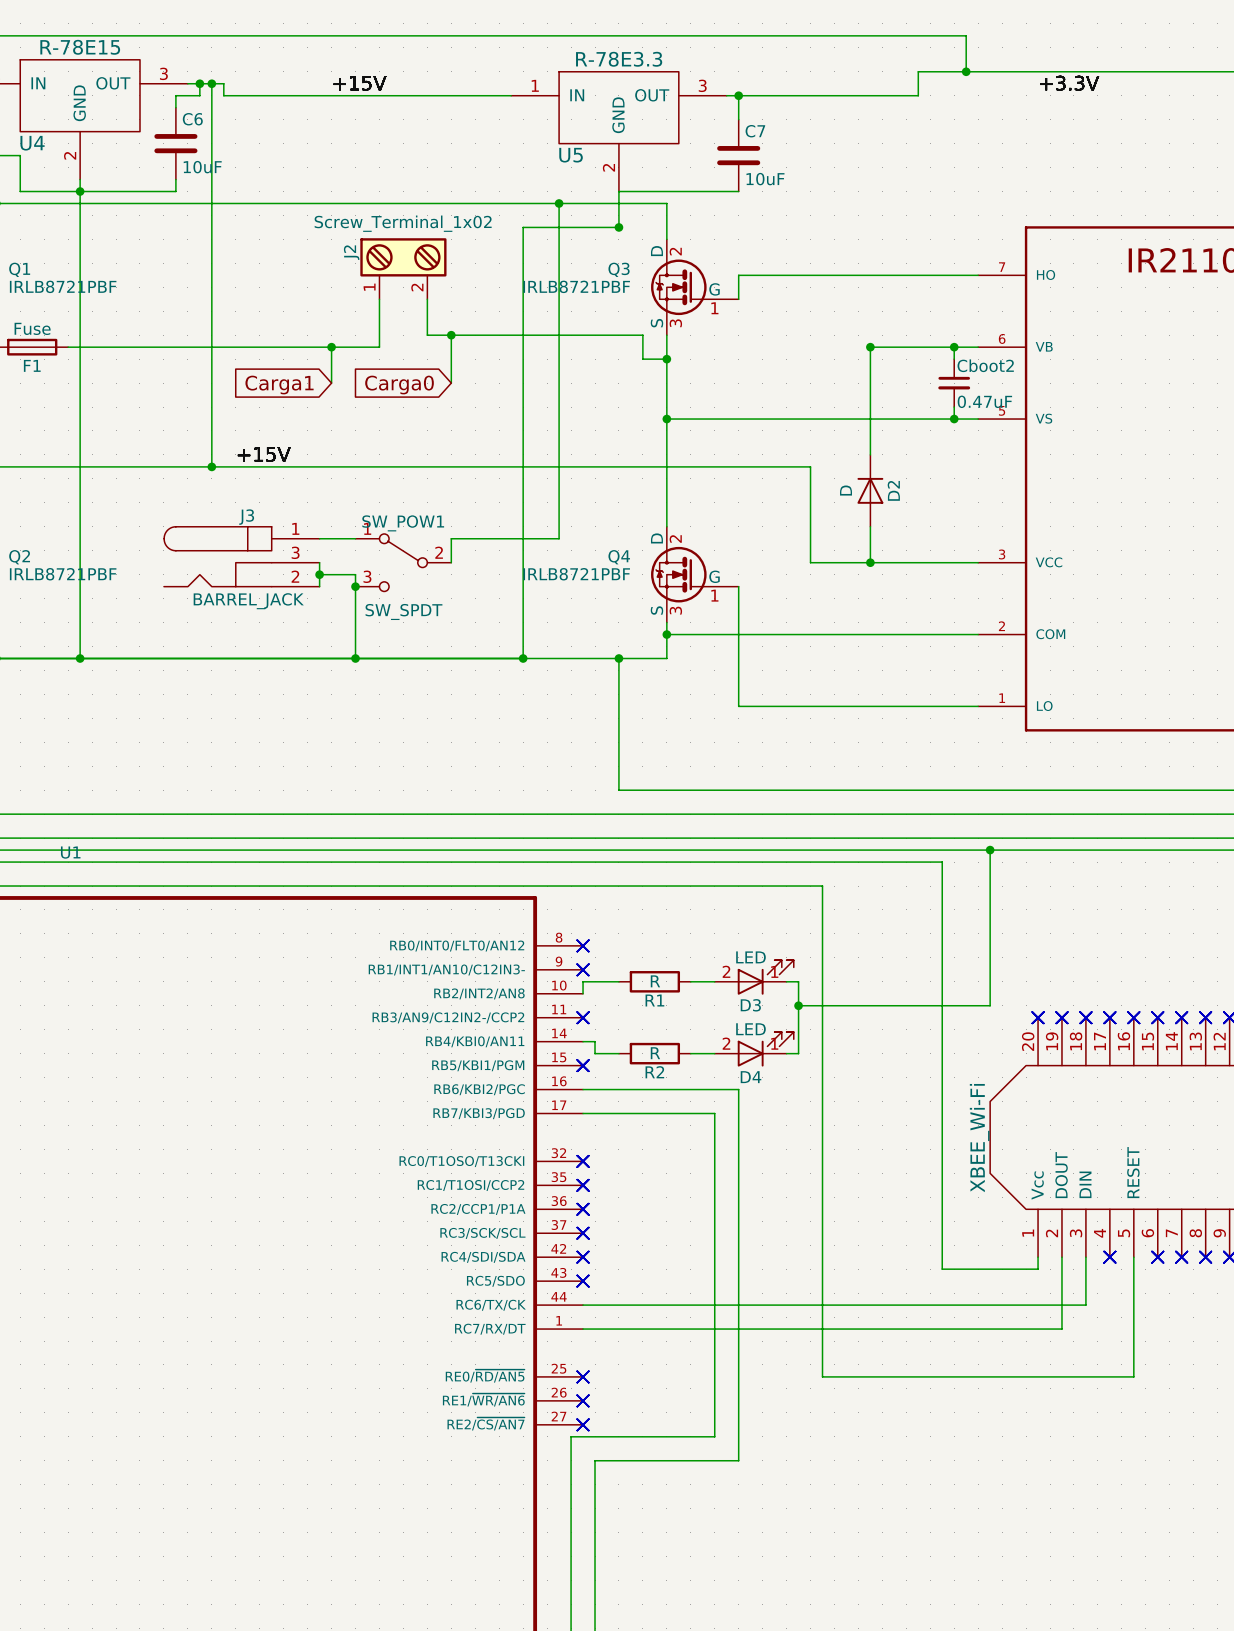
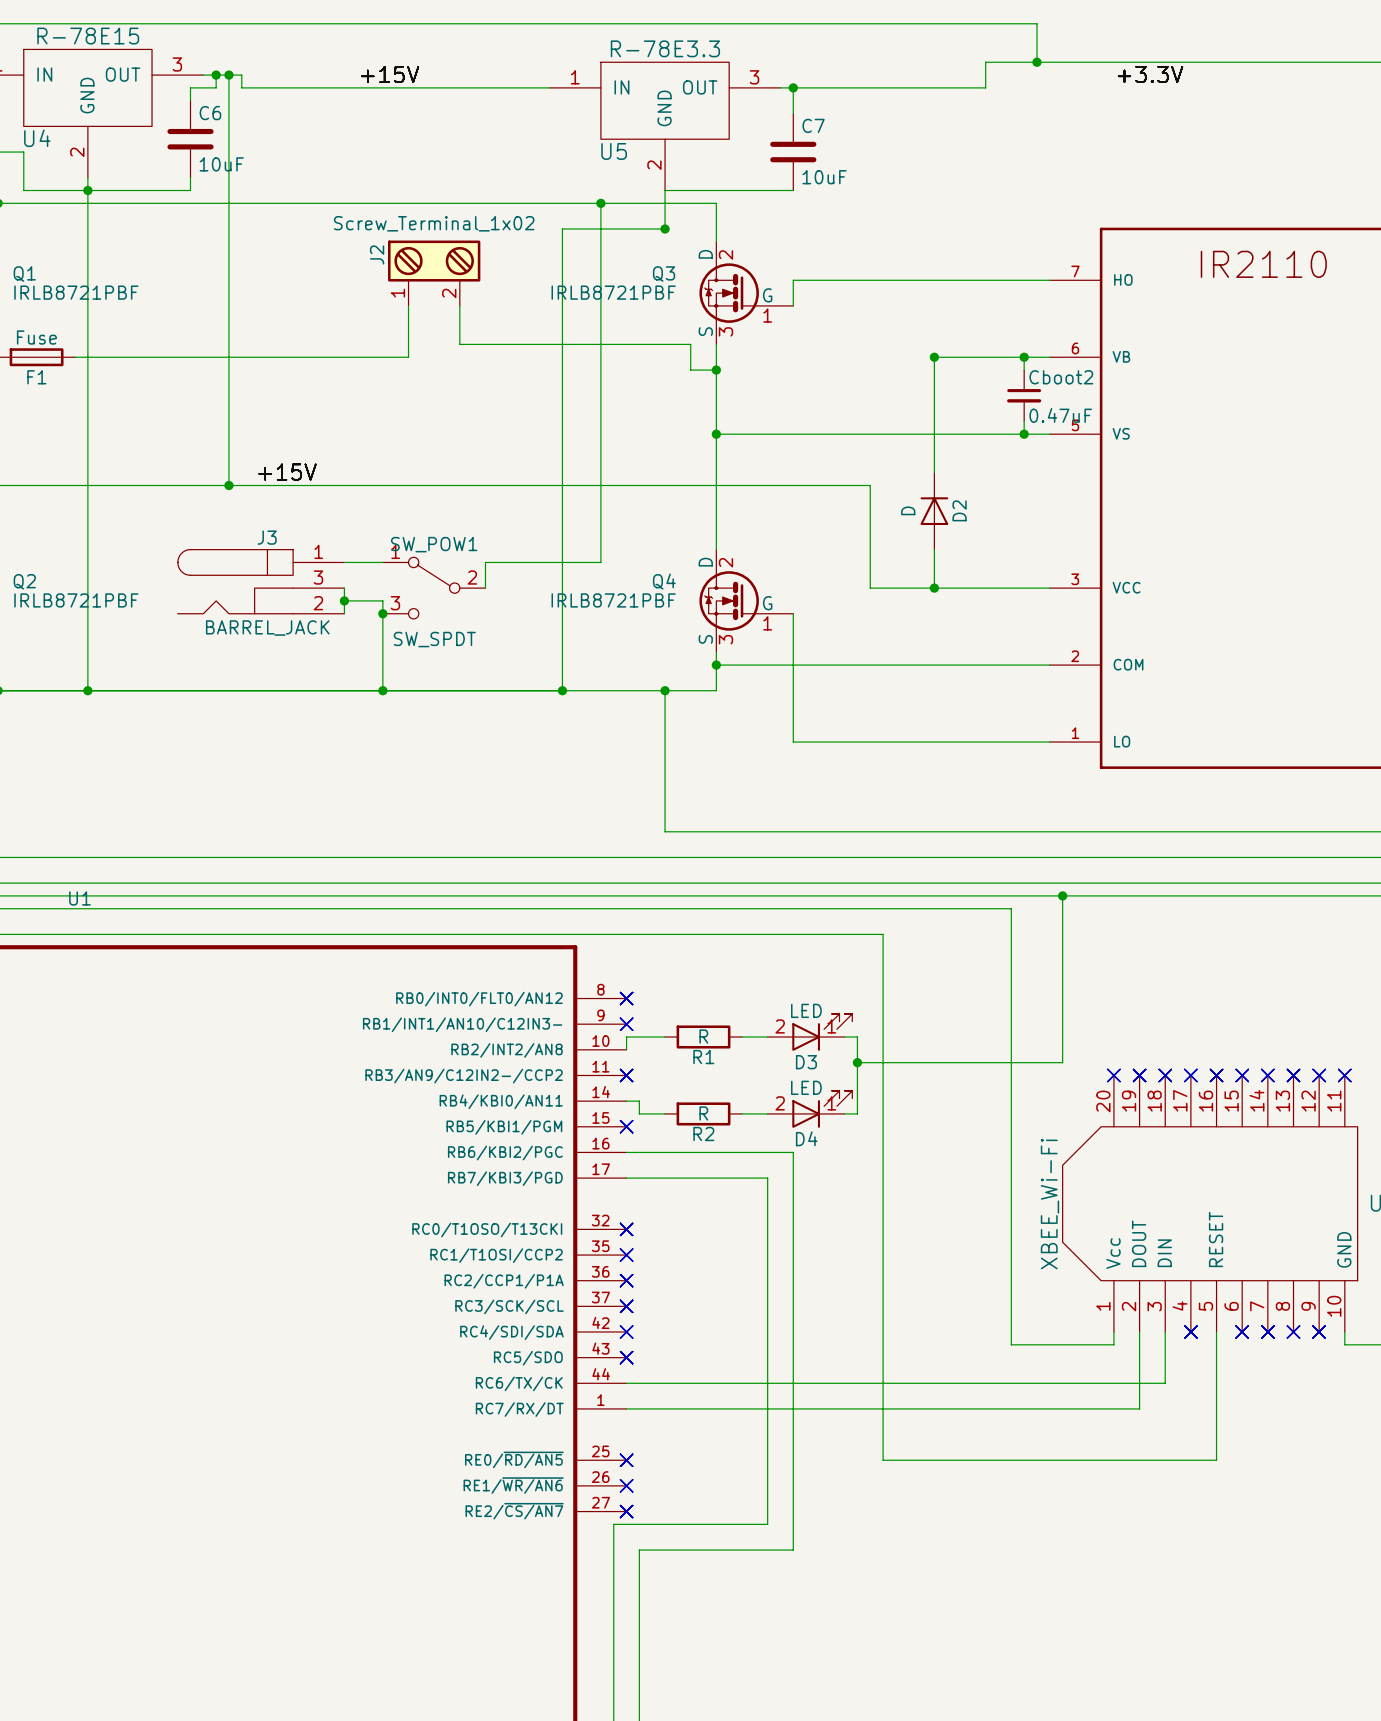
wire: (451, 335) (451, 383) -> none
junction: (451, 335) -> none
wire: (331, 347) (331, 383) -> none
junction: (331, 347) -> none
global label: Carga1 (279, 385) -> none
global label: Carga0 (399, 385) -> none

